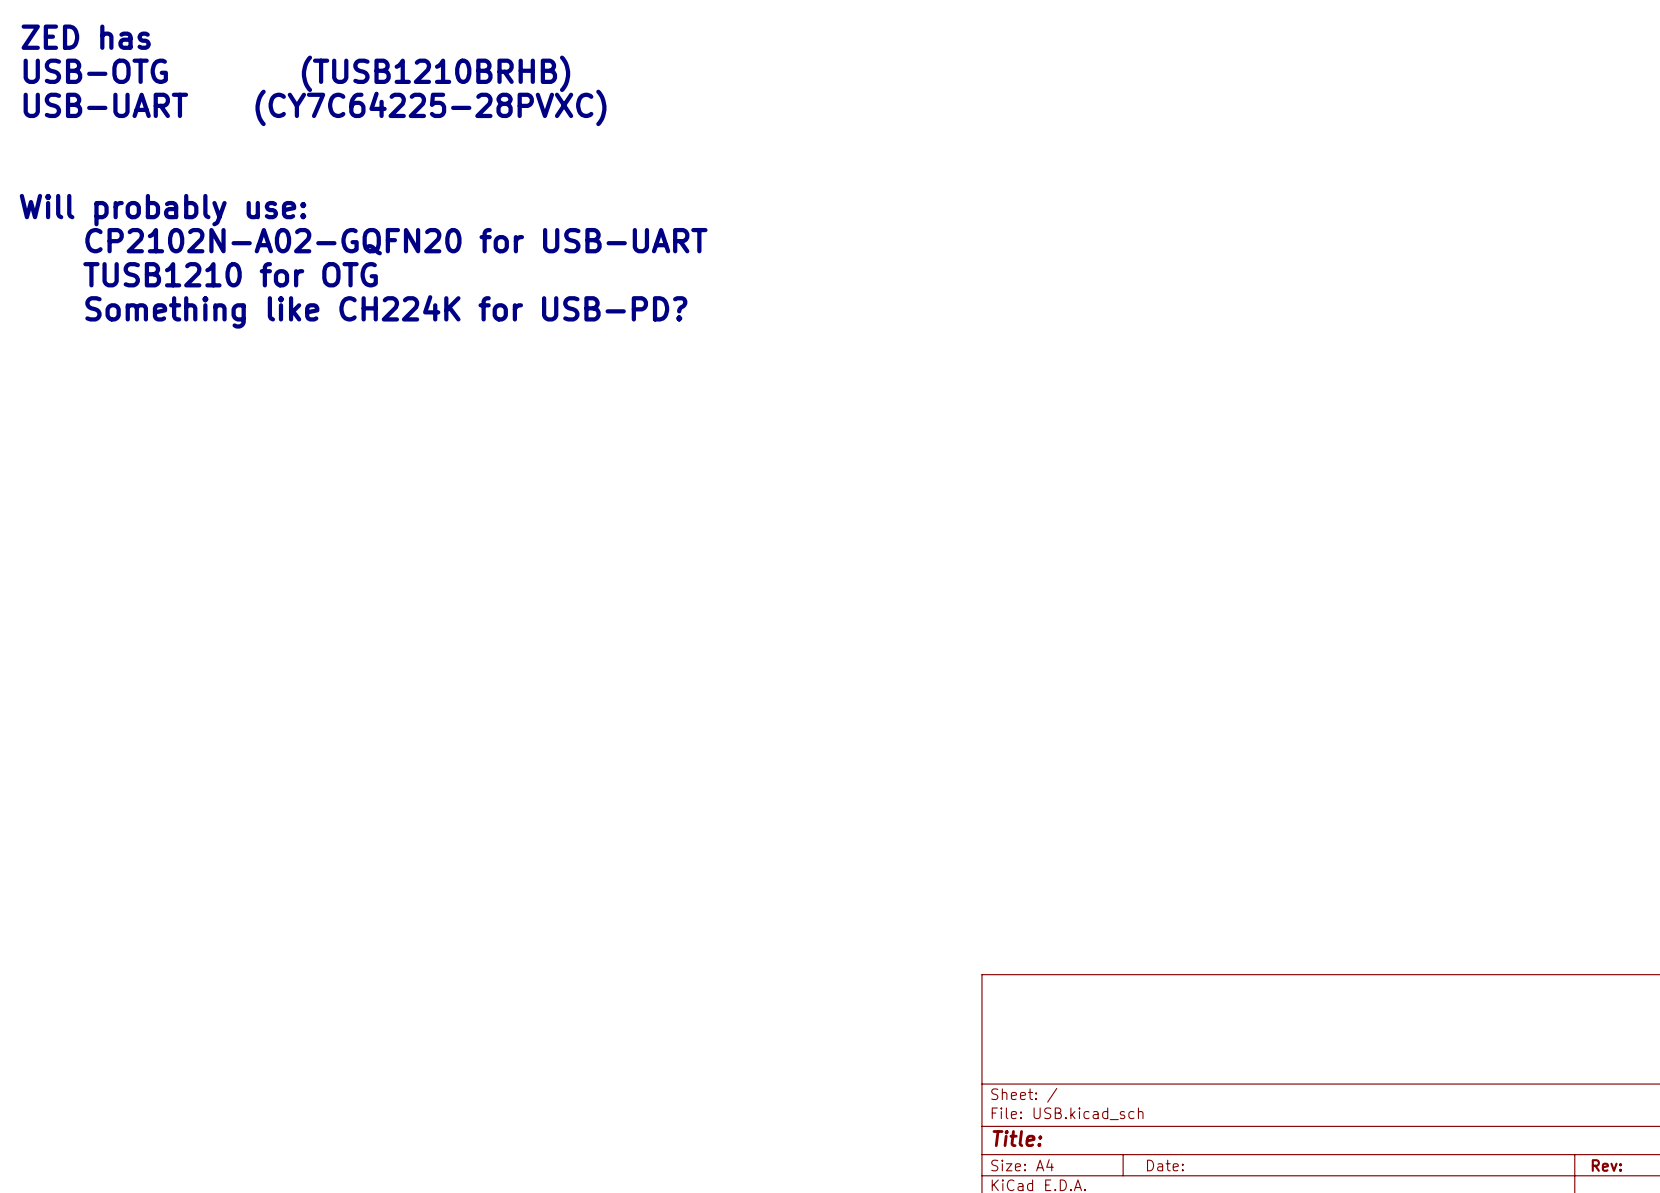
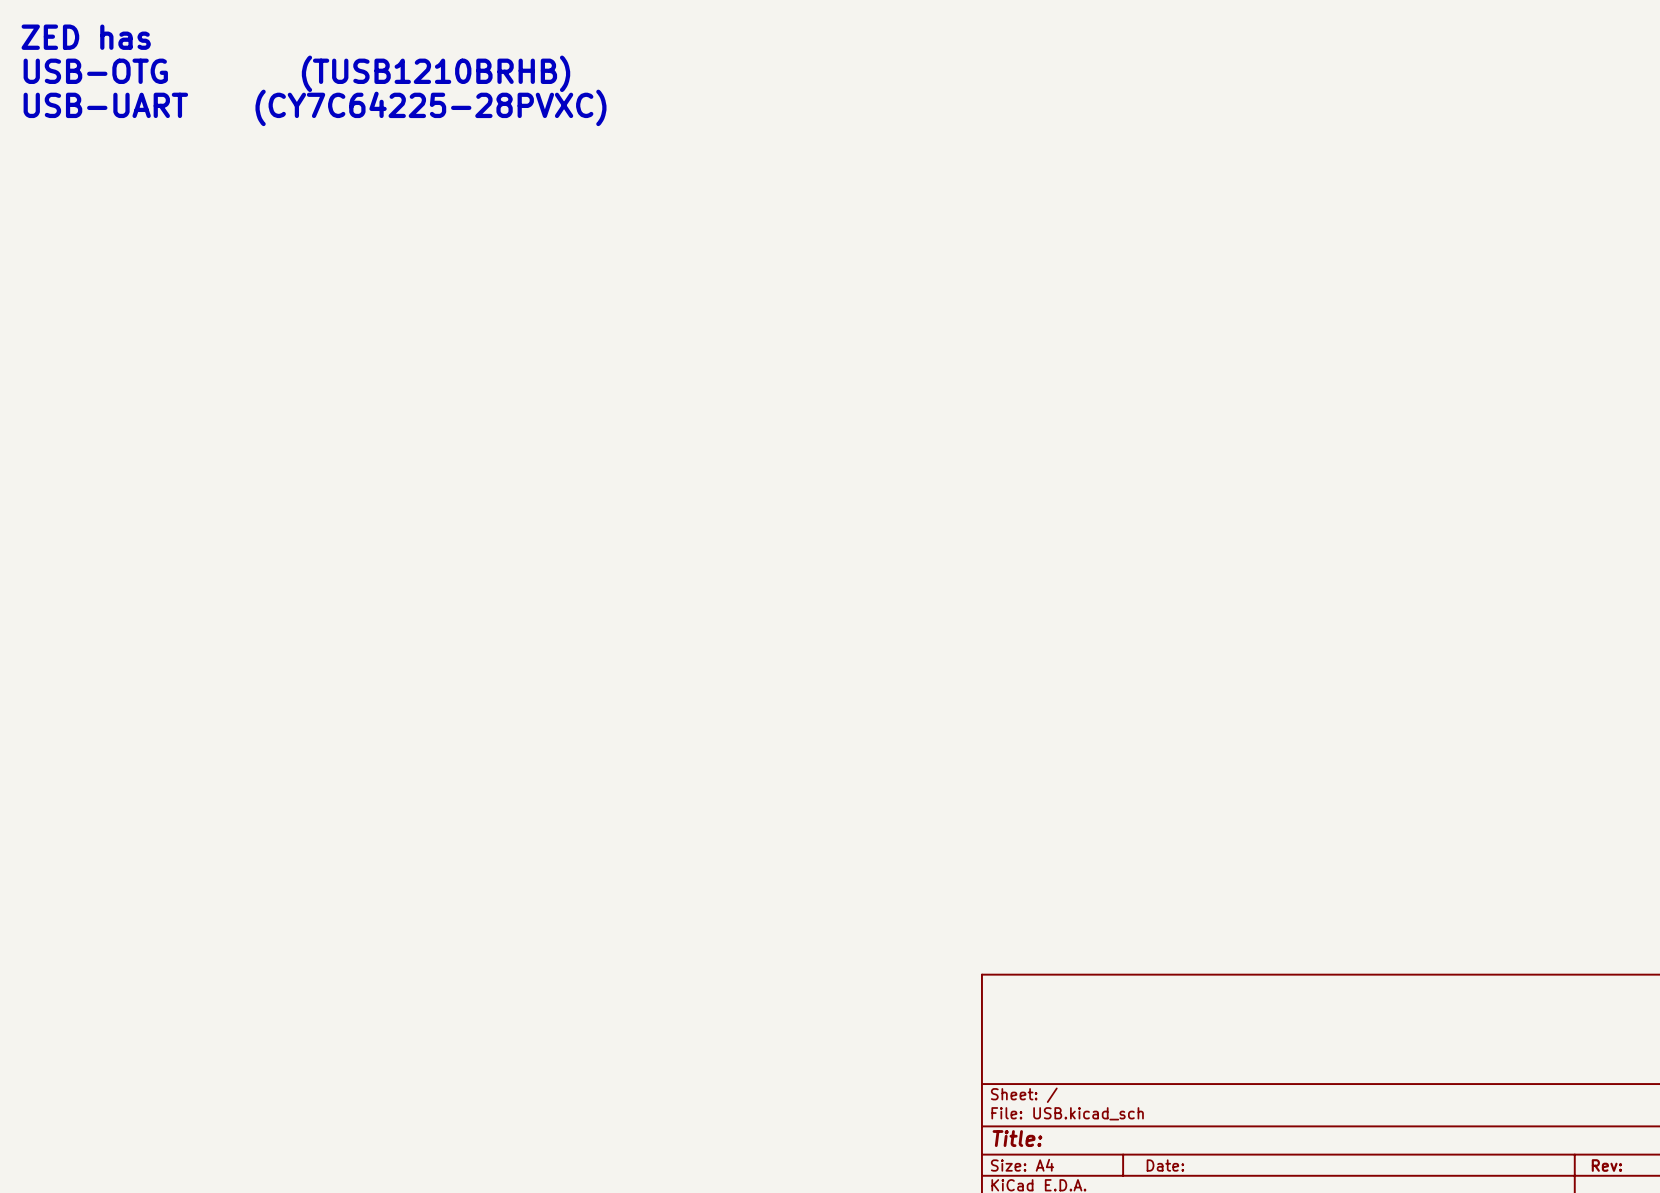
text: Will probably use: (163, 210) -> none
text: CP2102N-A02-GQFN20 for USB-UART (396, 241) -> none
text: TUSB1210 for OTG (230, 274) -> none
text: Something like CH224K for USB-PD? (386, 311) -> none

